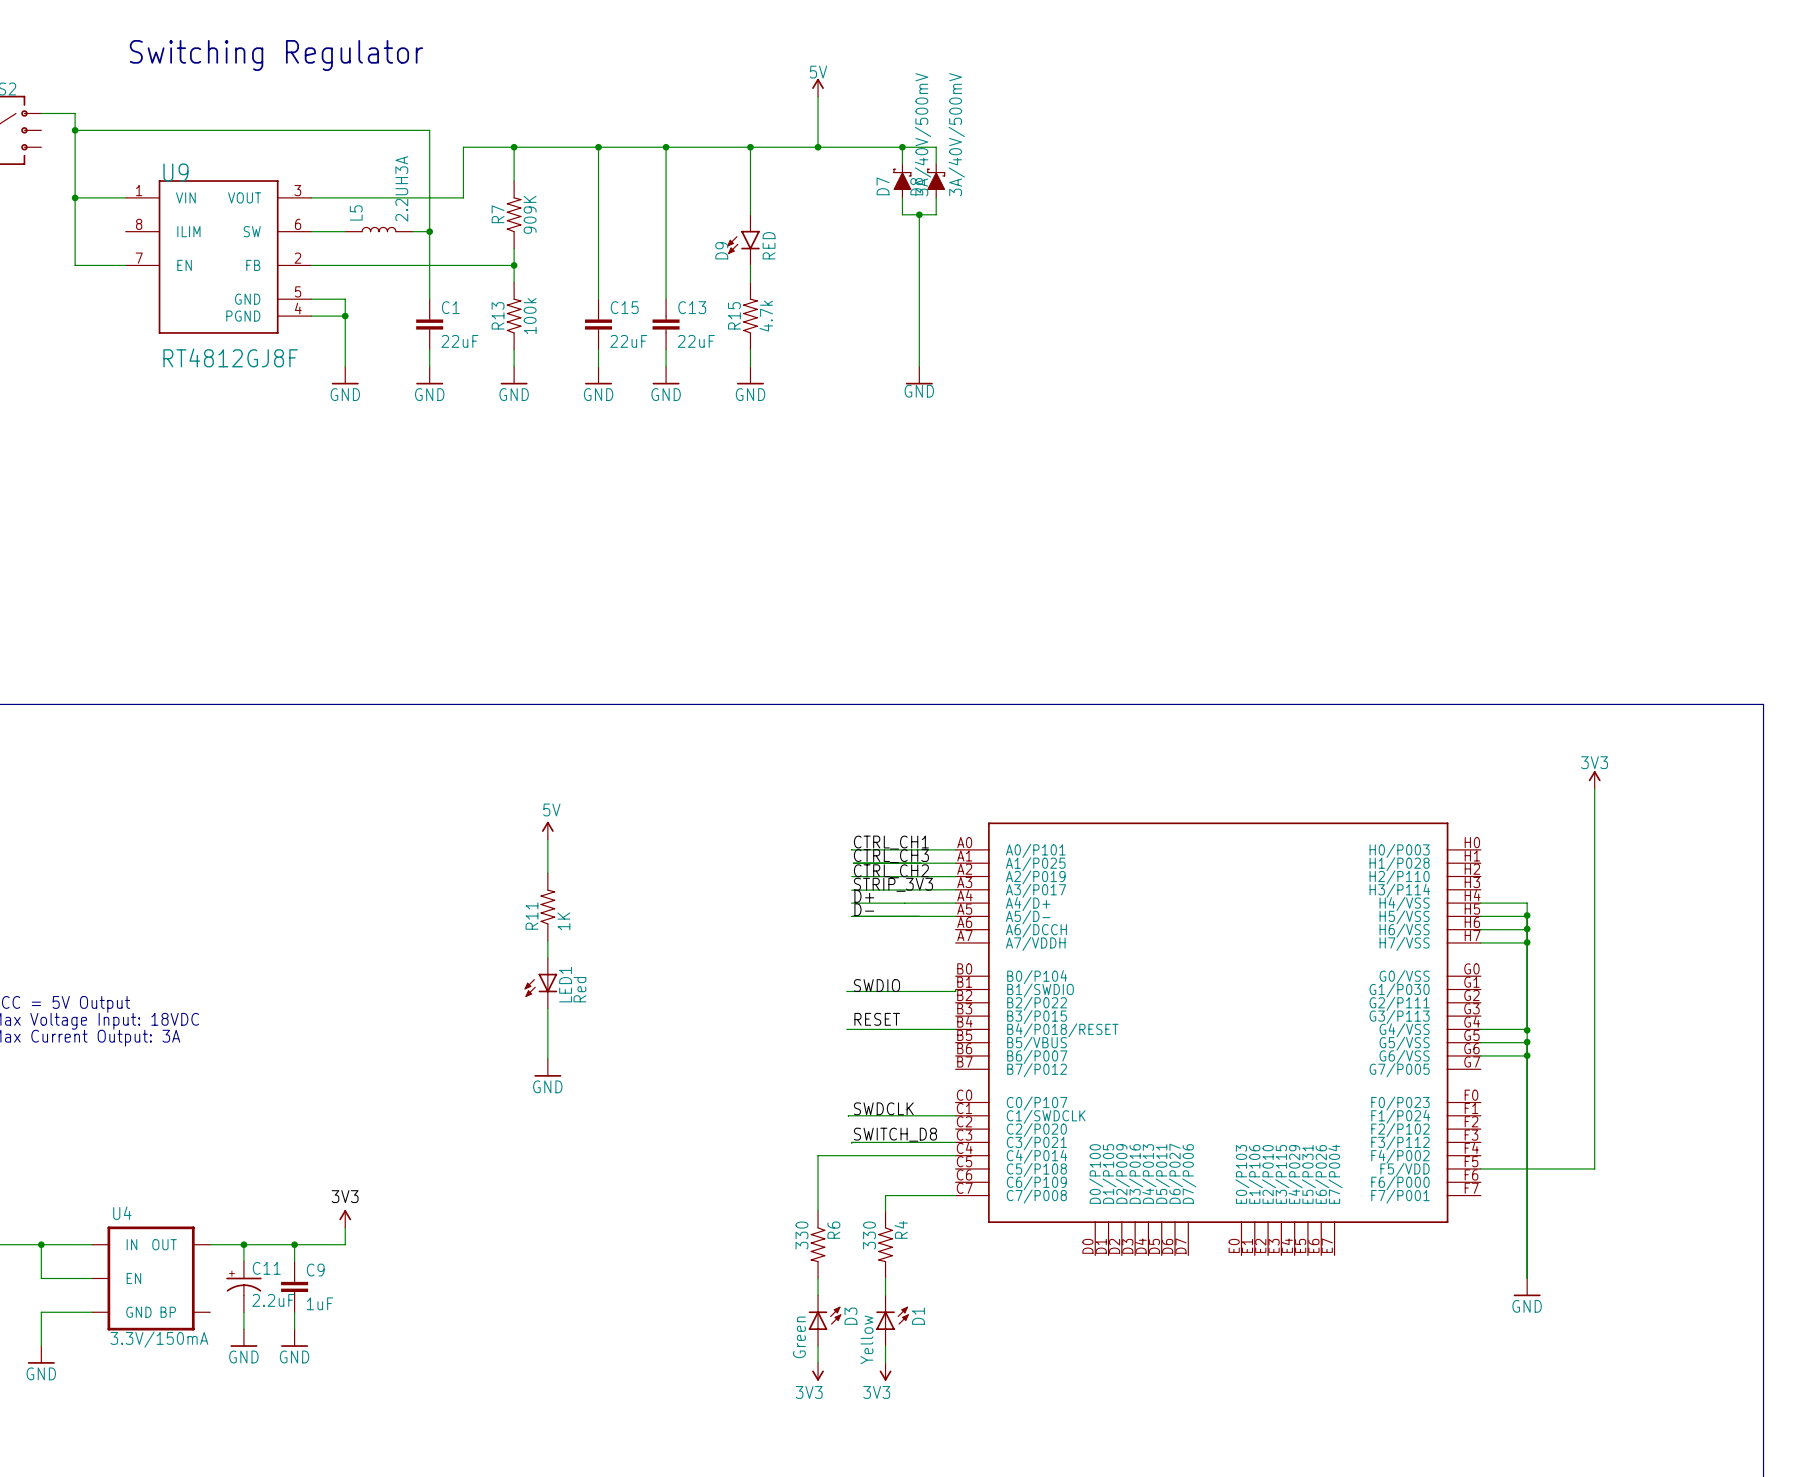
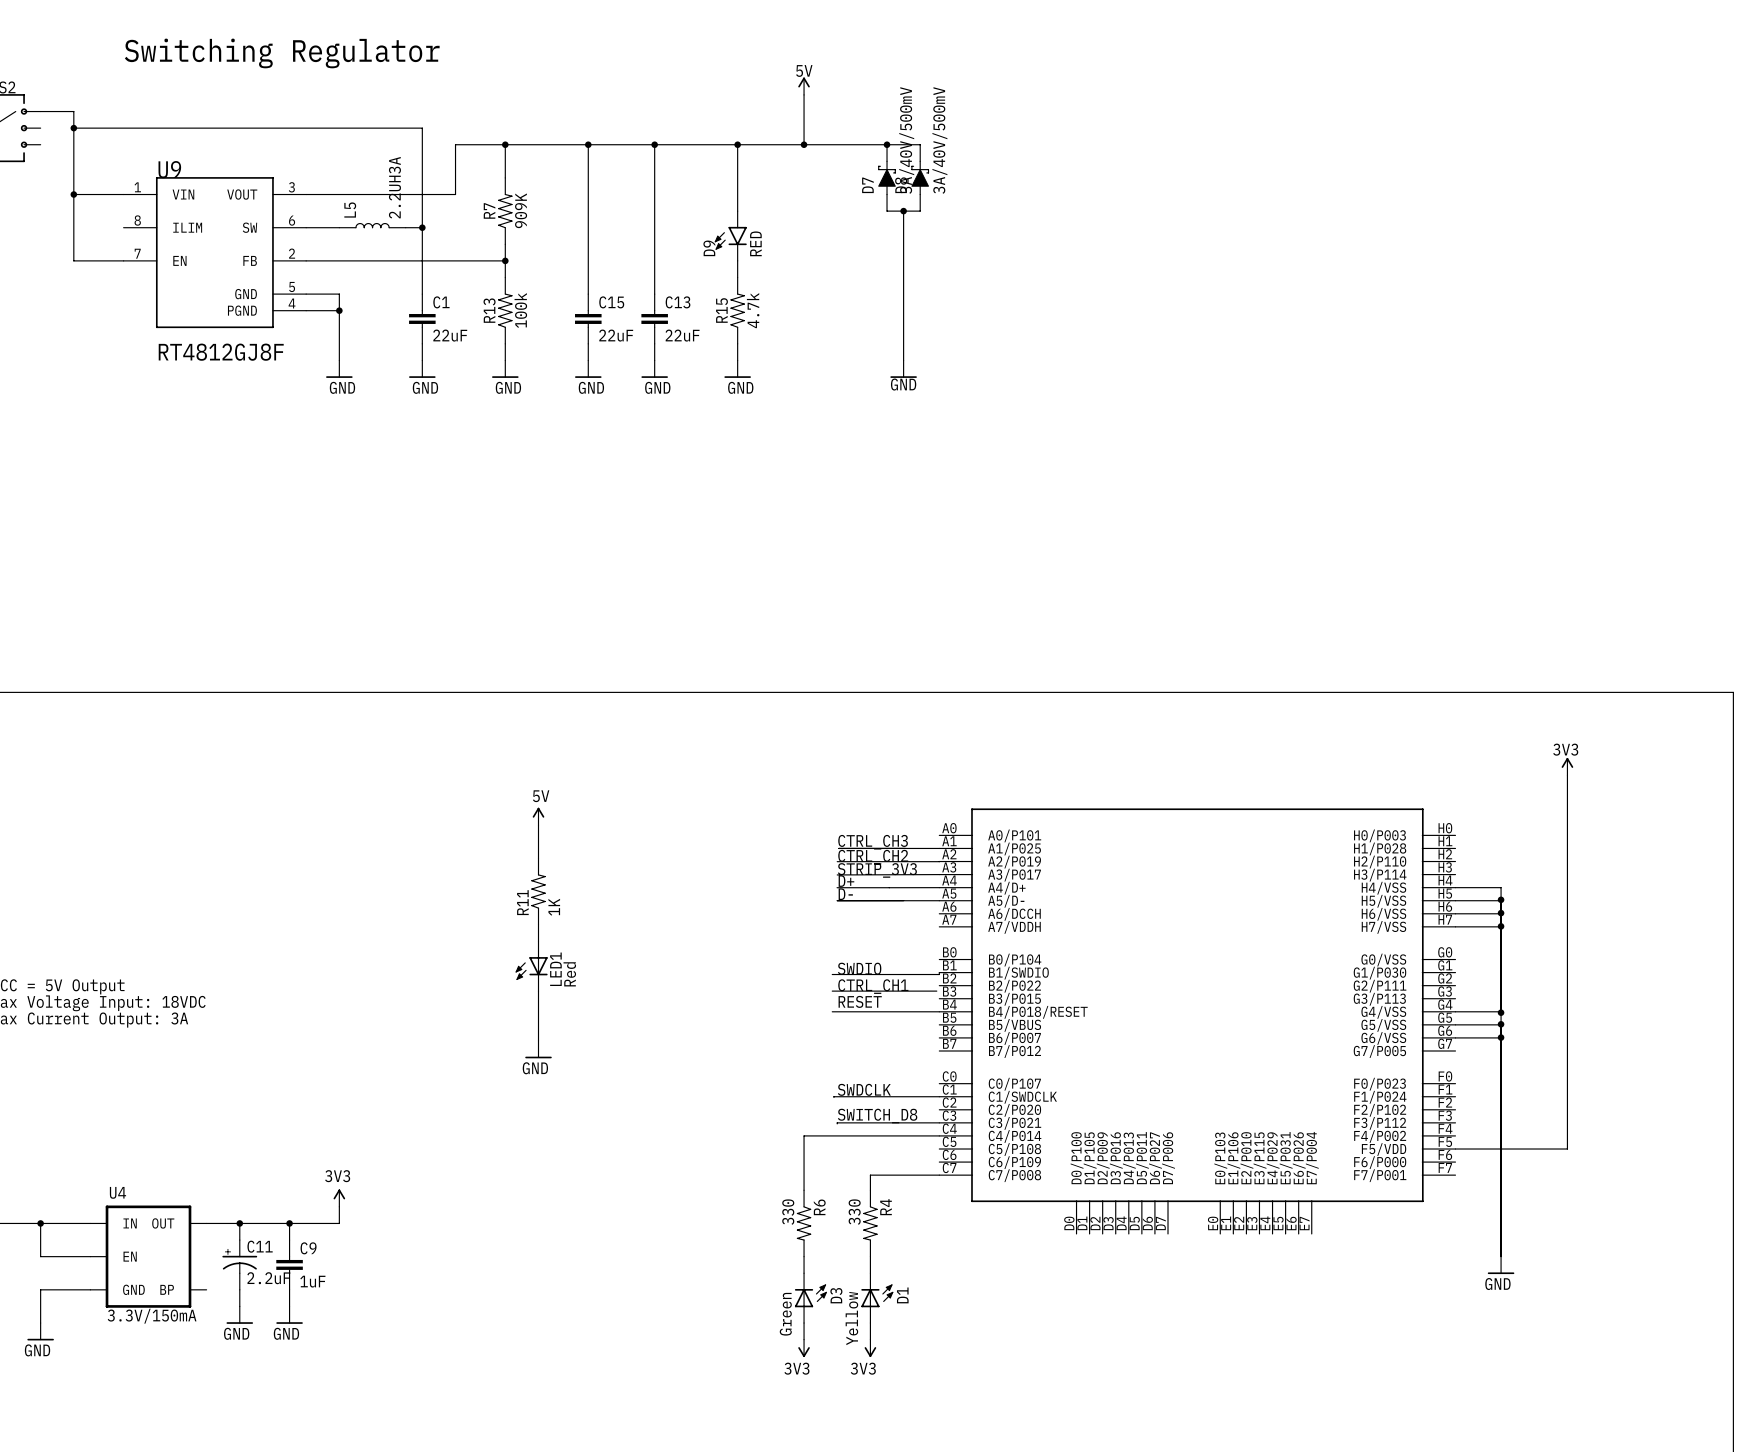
label position: CTRL_CH1 (891, 842) -> CTRL_CH1 (873, 986)
wire: (851, 849) (955, 849) -> none
wire: none -> (832, 991) (936, 991)

